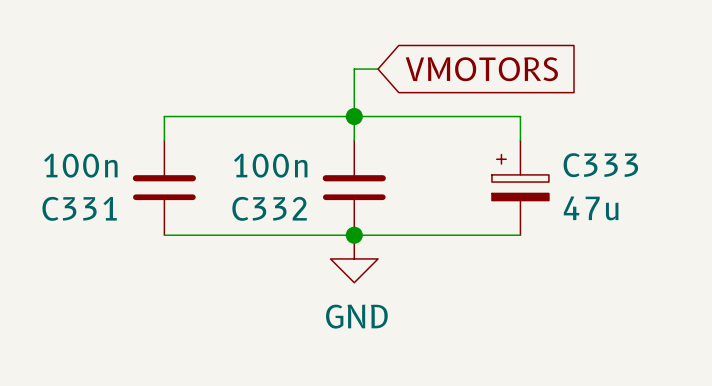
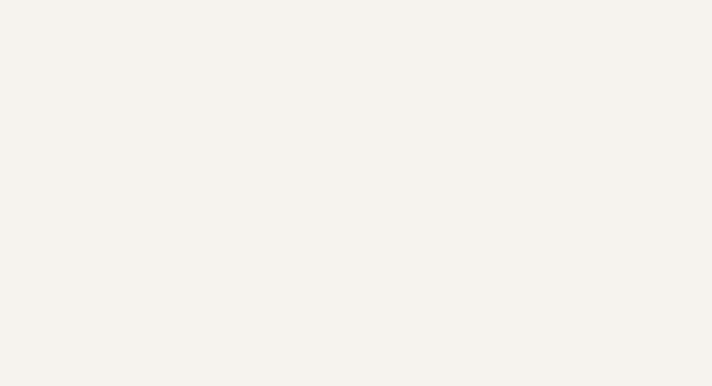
wire: (378, 69) (354, 69) (354, 140) -> none
global label: VMOTORS (481, 69) -> none
junction: (354, 116) -> none
wire: (164, 140) (164, 116) (520, 116) (520, 140) -> none
C331: 100n (164, 187) -> none
C332: 100n (354, 187) -> none
C333: 47u (520, 187) -> none
wire: (164, 235) (520, 235) -> none
junction: (354, 235) -> none
power symbol: GND (354, 258) -> none

